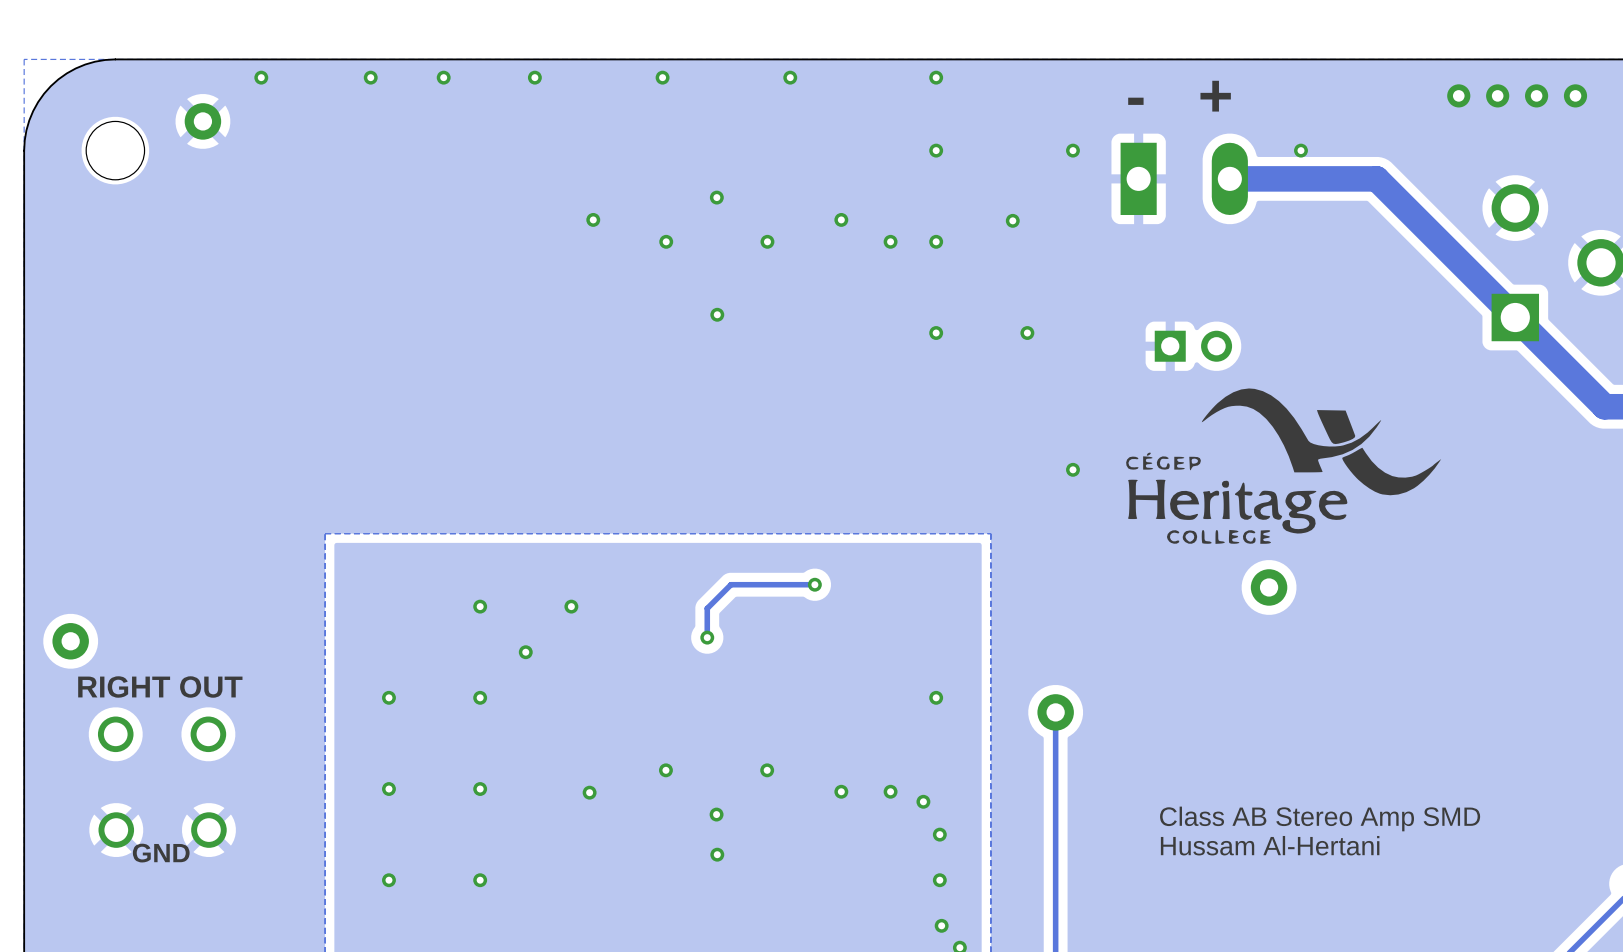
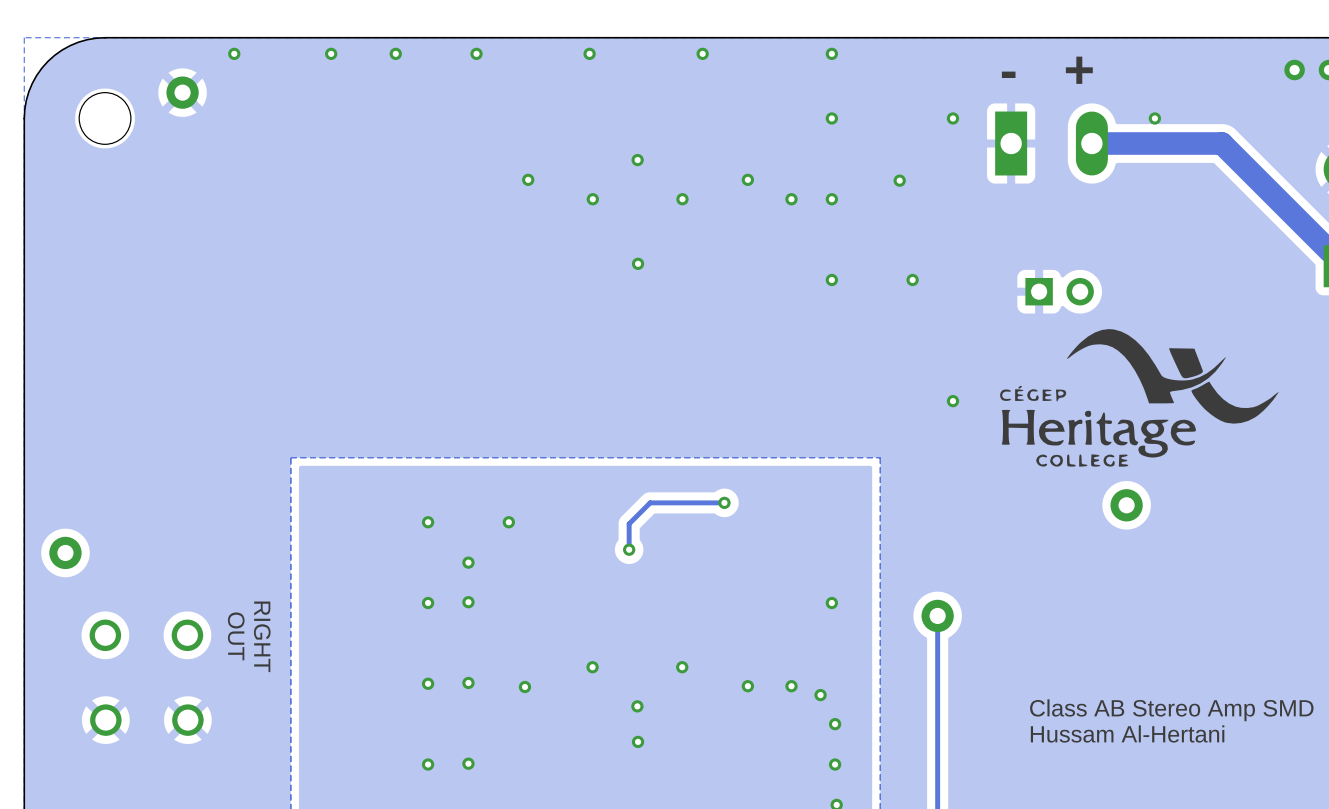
text: RIGHT OUT (160, 687) -> RIGHT (262, 636)
via: none -> (468, 602)
via: (388, 697) -> none
text: none -> OUT (236, 636)
via: none -> (468, 682)
via: (388, 789) -> none
text: GND (161, 853) -> none
via: none -> (468, 763)
via: (388, 880) -> none

